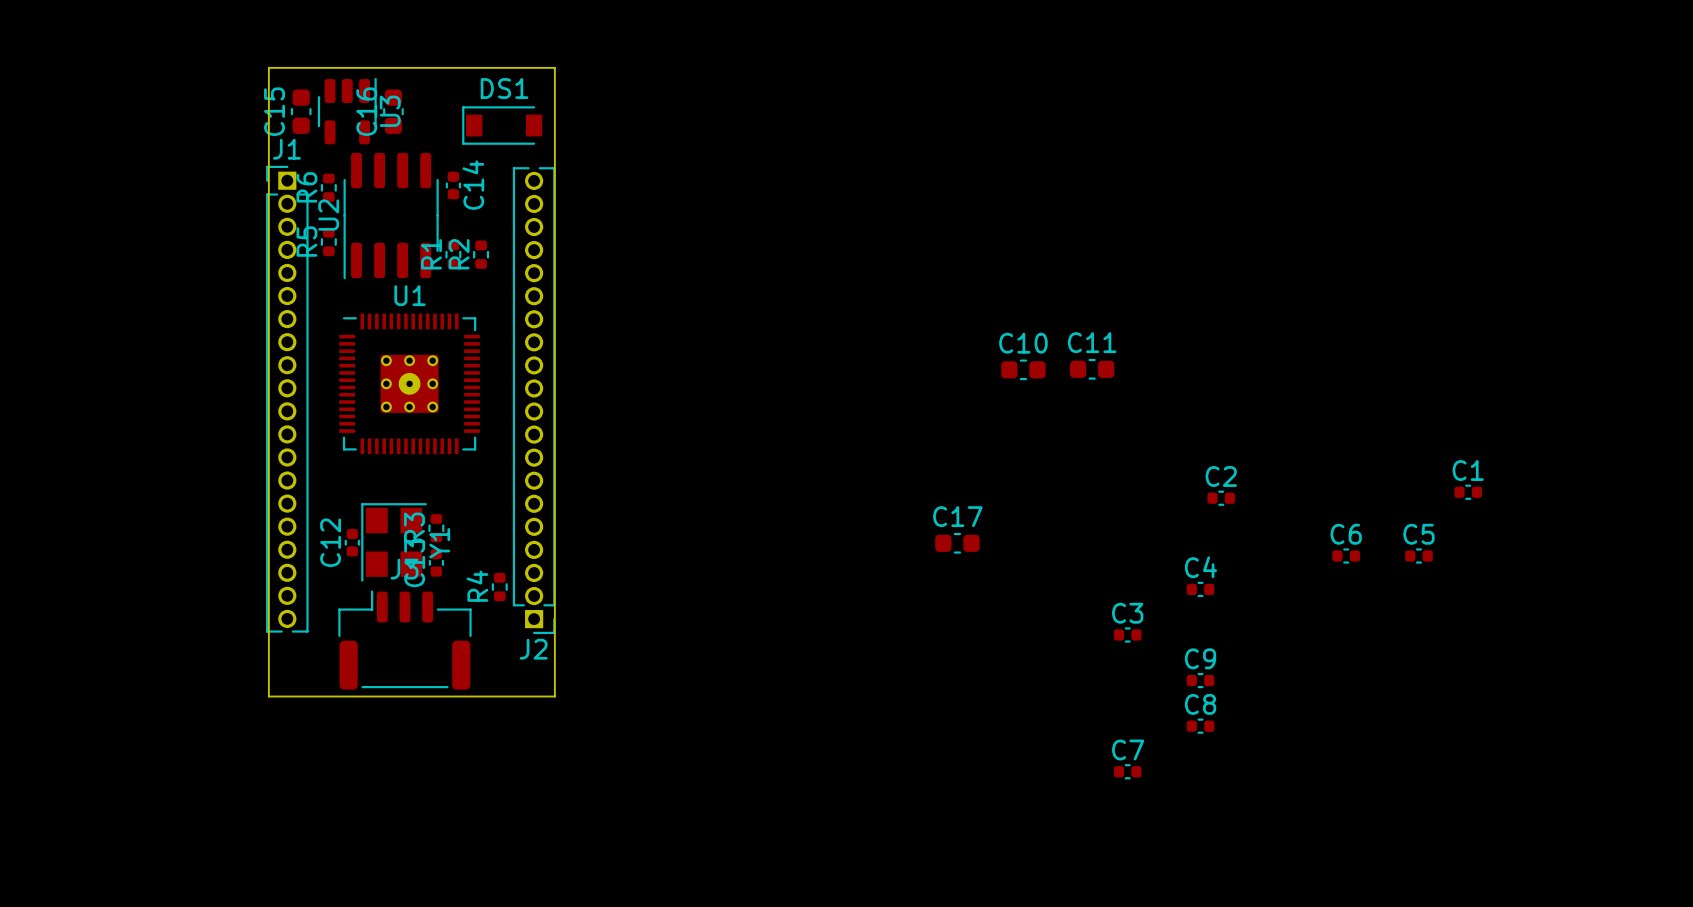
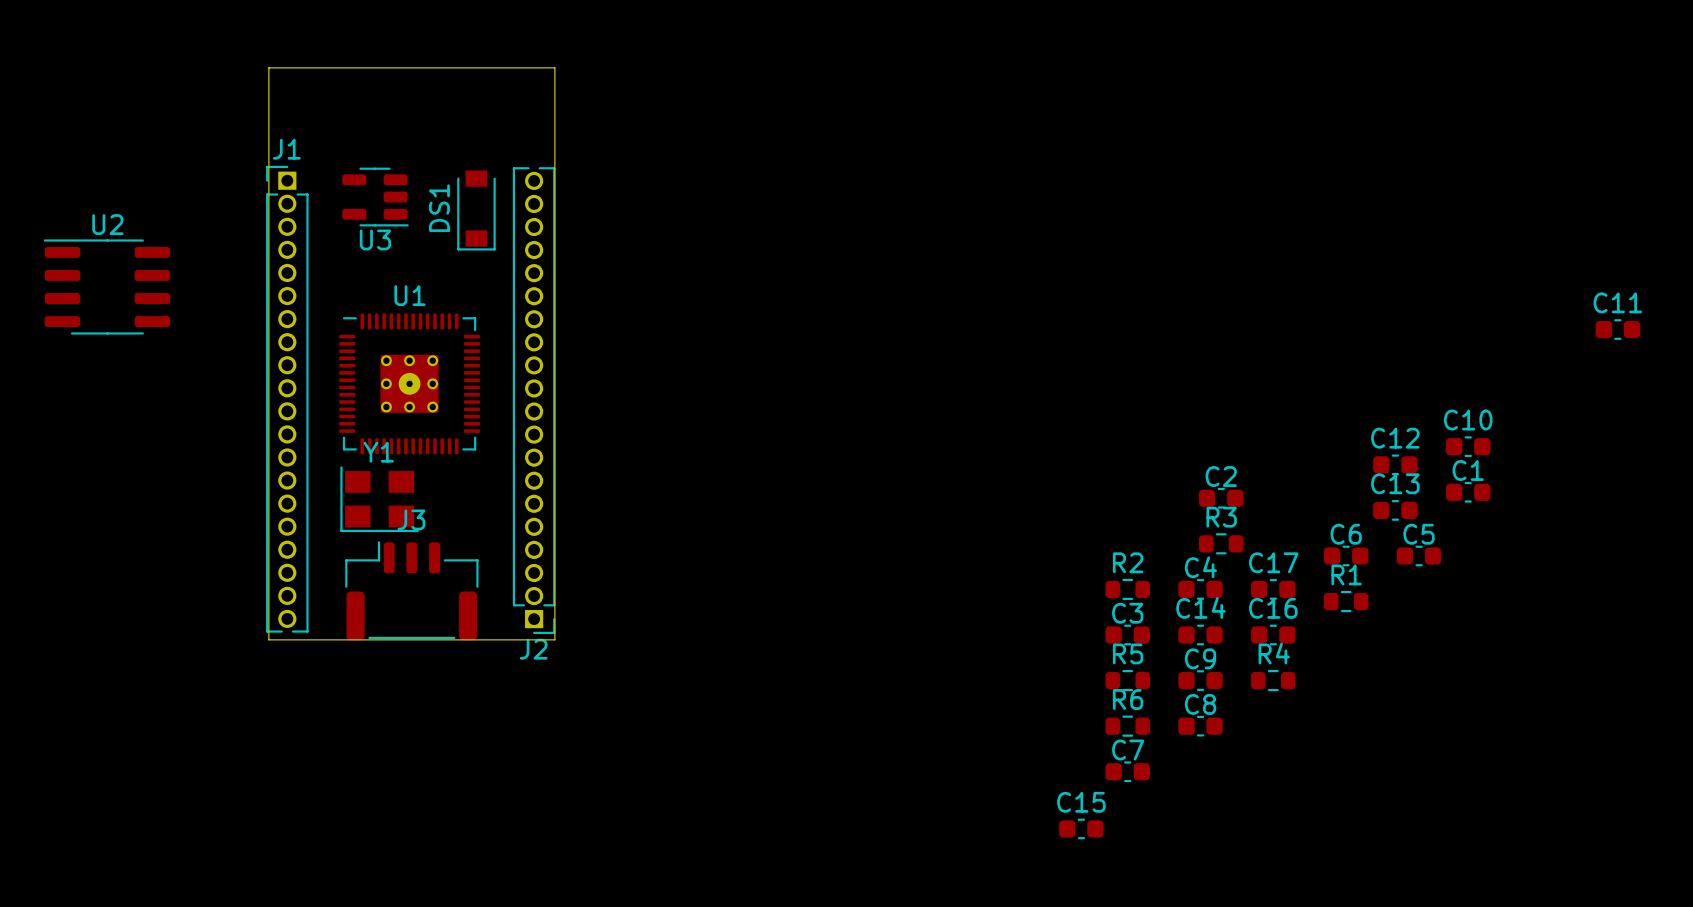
C15 rotation: 0° (301, 111) -> 90° clockwise (1081, 828)
C15 position: (301, 111) -> (1081, 828)
U3 rotation: 0° (347, 111) -> 90° clockwise (375, 197)
U3 position: (347, 111) -> (375, 197)
C16 rotation: 0° (393, 111) -> 90° clockwise (1273, 634)
C16 position: (393, 111) -> (1273, 634)
DS1 rotation: 0° (502, 125) -> 90° counterclockwise (476, 210)
DS1 position: (502, 125) -> (476, 210)
C14 footprint: [445, 171, 462, 200] -> [1178, 624, 1223, 646]
R6 footprint: [320, 173, 337, 202] -> [1105, 715, 1150, 737]
U2 rotation: 0° (391, 216) -> 90° clockwise (106, 286)
U2 position: (391, 216) -> (106, 286)
R5 footprint: [320, 227, 337, 257] -> [1105, 669, 1150, 692]
R1 footprint: [445, 240, 462, 269] -> [1323, 591, 1369, 613]
R2 footprint: [473, 240, 490, 269] -> [1105, 578, 1150, 600]
C10 position: (1023, 369) -> (1468, 446)
C11 position: (1092, 369) -> (1617, 329)
C1 footprint: [1454, 484, 1483, 500] -> [1445, 481, 1491, 503]
C2 footprint: [1207, 490, 1236, 506] -> [1198, 487, 1244, 509]
R3 footprint: [428, 514, 445, 543] -> [1198, 533, 1244, 555]
C12 footprint: [344, 528, 360, 557] -> [1373, 454, 1418, 476]
Y1 rotation: 0° (394, 542) -> 90° counterclockwise (379, 499)
C17 position: (957, 543) -> (1273, 589)
C6 footprint: [1332, 548, 1360, 564] -> [1323, 545, 1369, 567]
C5 footprint: [1405, 548, 1433, 564] -> [1396, 545, 1442, 567]
C13 footprint: [428, 549, 445, 577] -> [1373, 500, 1418, 521]
R4 footprint: [491, 572, 508, 602] -> [1251, 669, 1296, 692]
C4 footprint: [1186, 581, 1215, 598] -> [1178, 579, 1223, 600]
C3 footprint: [1113, 627, 1142, 643] -> [1105, 624, 1150, 646]
board edge: (268, 639) (268, 696) (554, 696) (554, 639) -> (268, 639) (554, 639)
J3 position: (404, 640) -> (411, 590)
C9 footprint: [1186, 672, 1215, 689] -> [1178, 670, 1223, 691]
C8 footprint: [1186, 718, 1215, 734] -> [1178, 715, 1223, 737]
C7 footprint: [1113, 764, 1142, 780] -> [1105, 761, 1150, 783]

